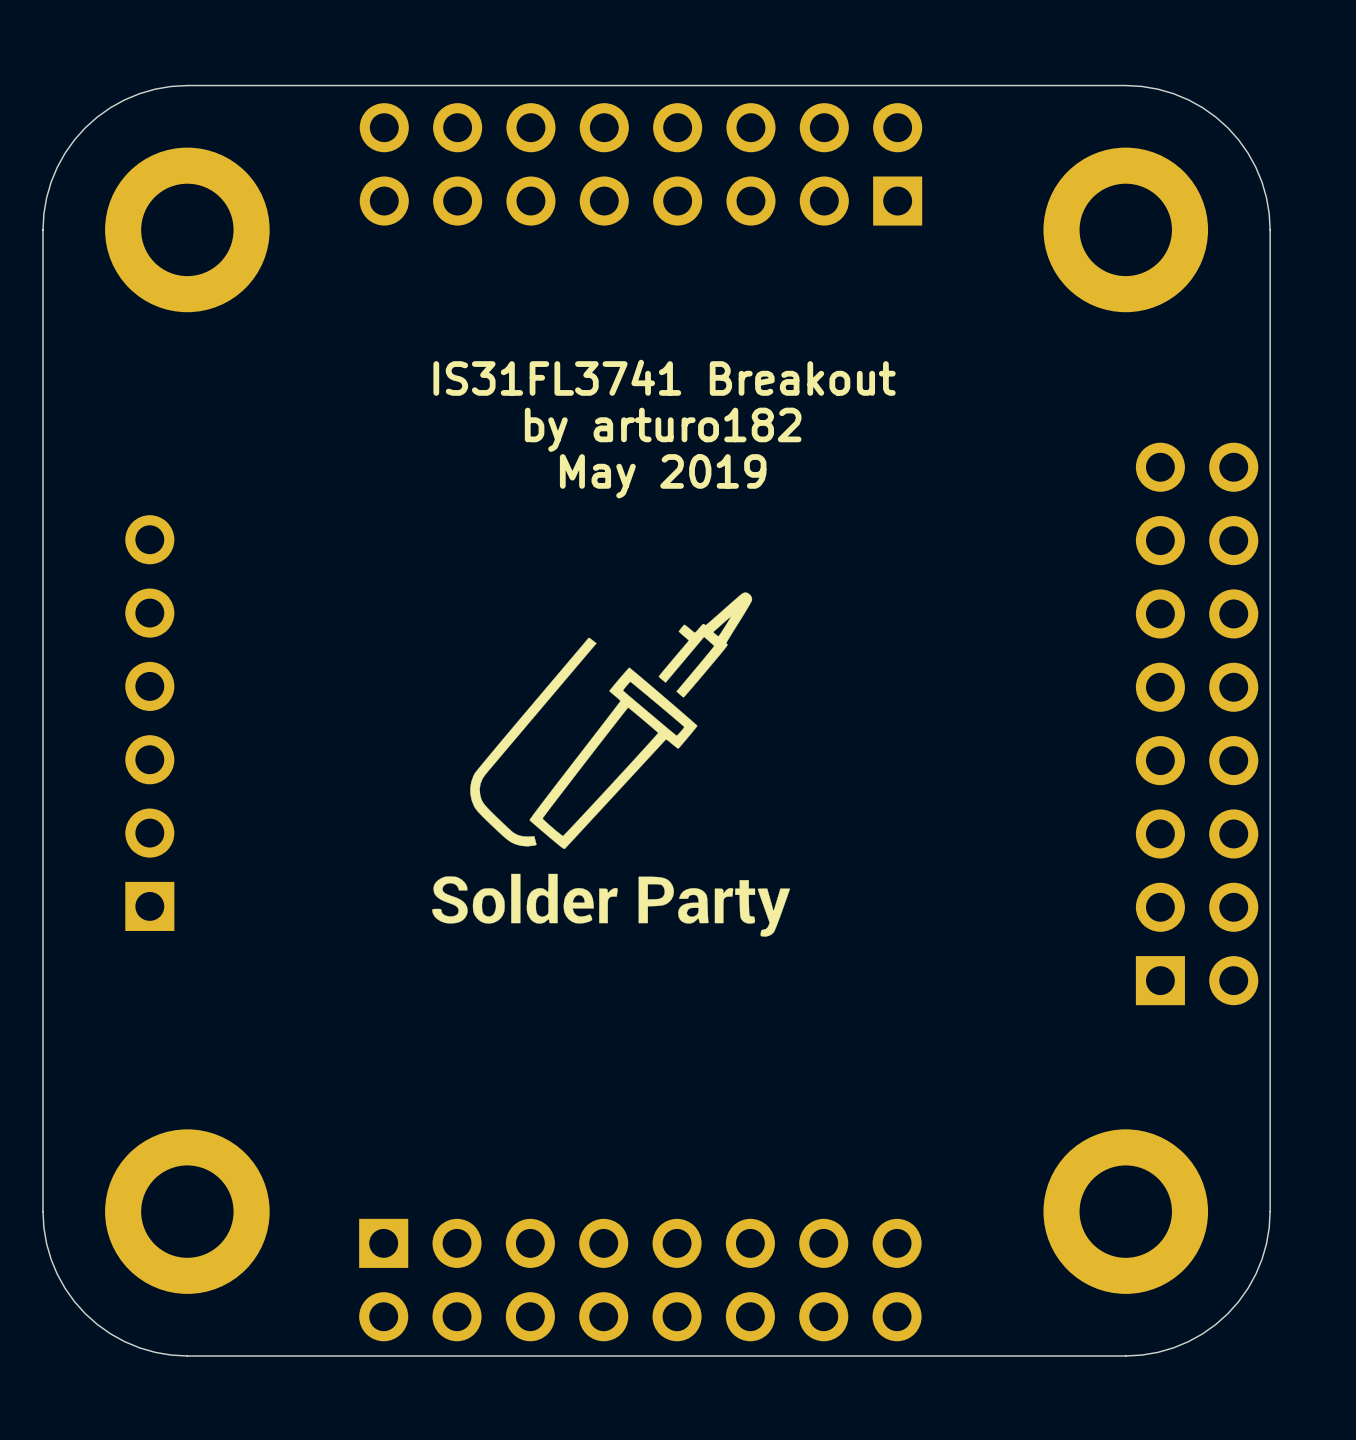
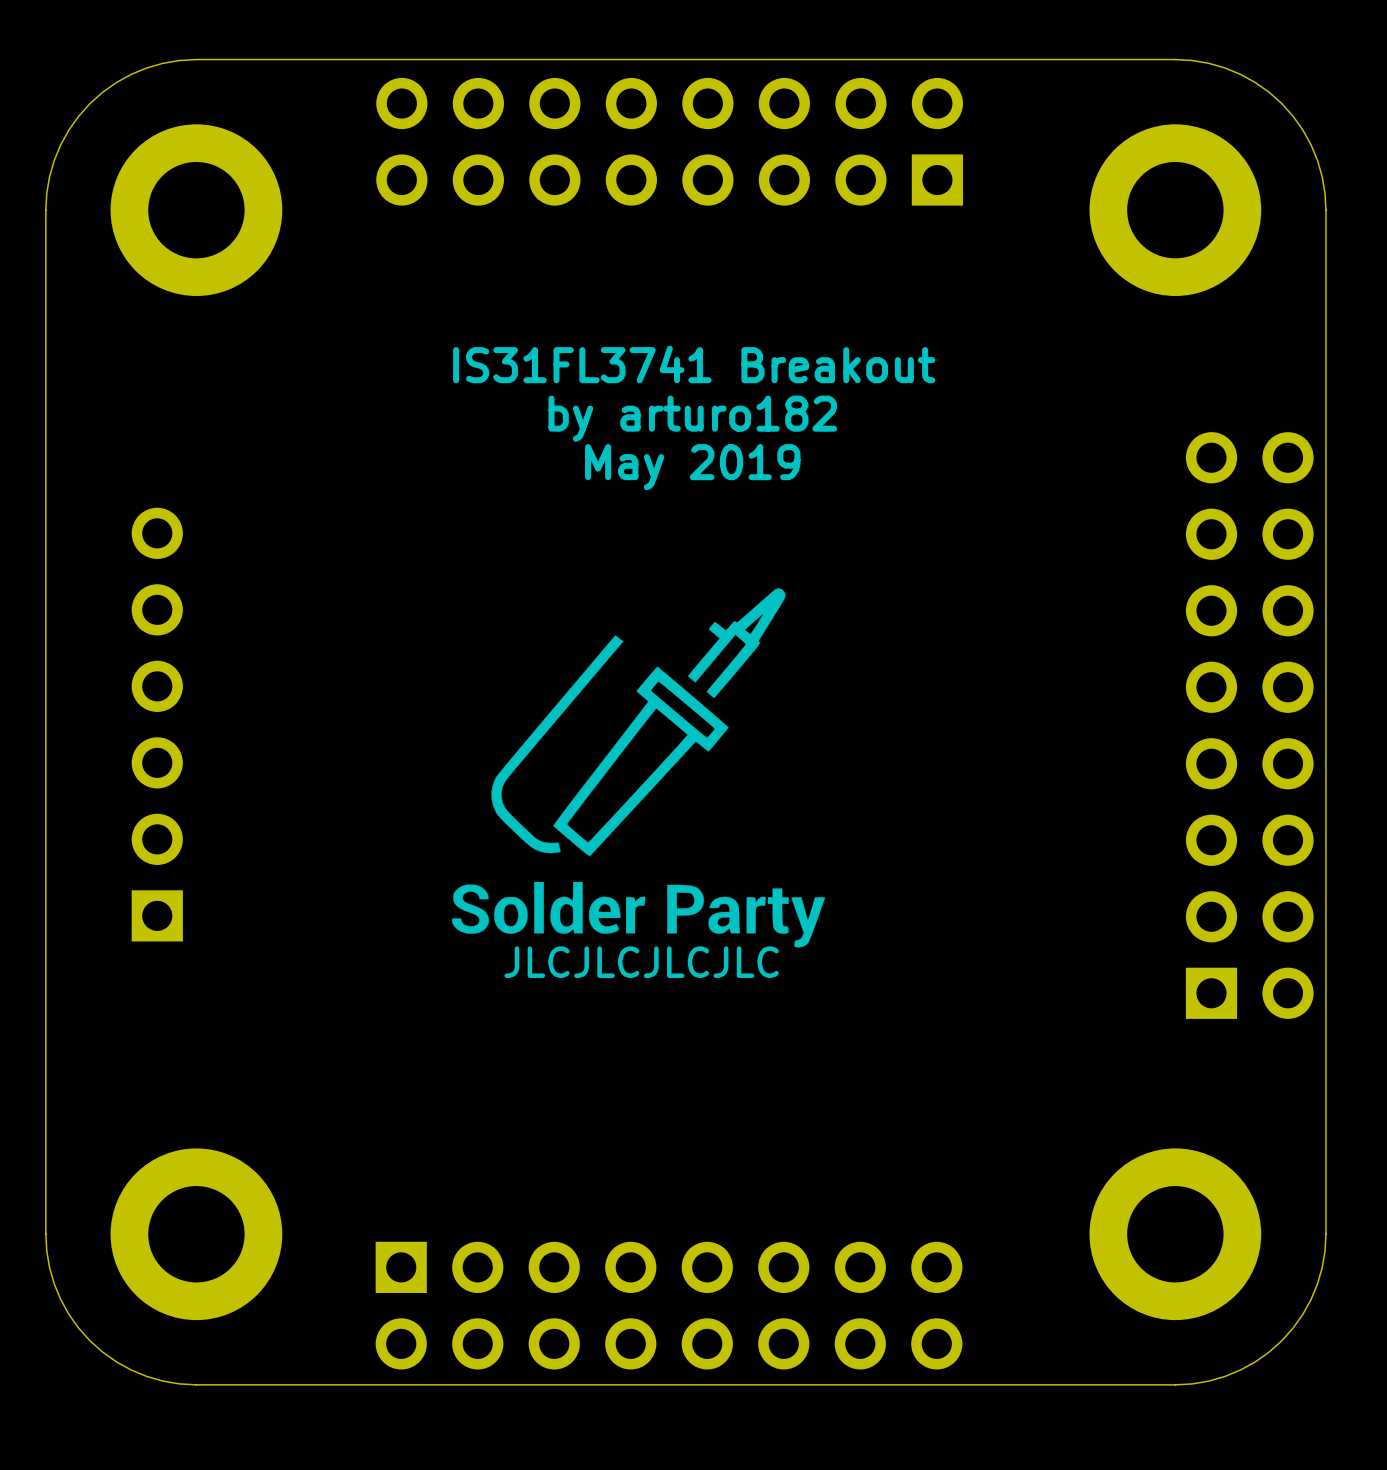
text: none -> JLCJLCJLCJLC (641, 962)

